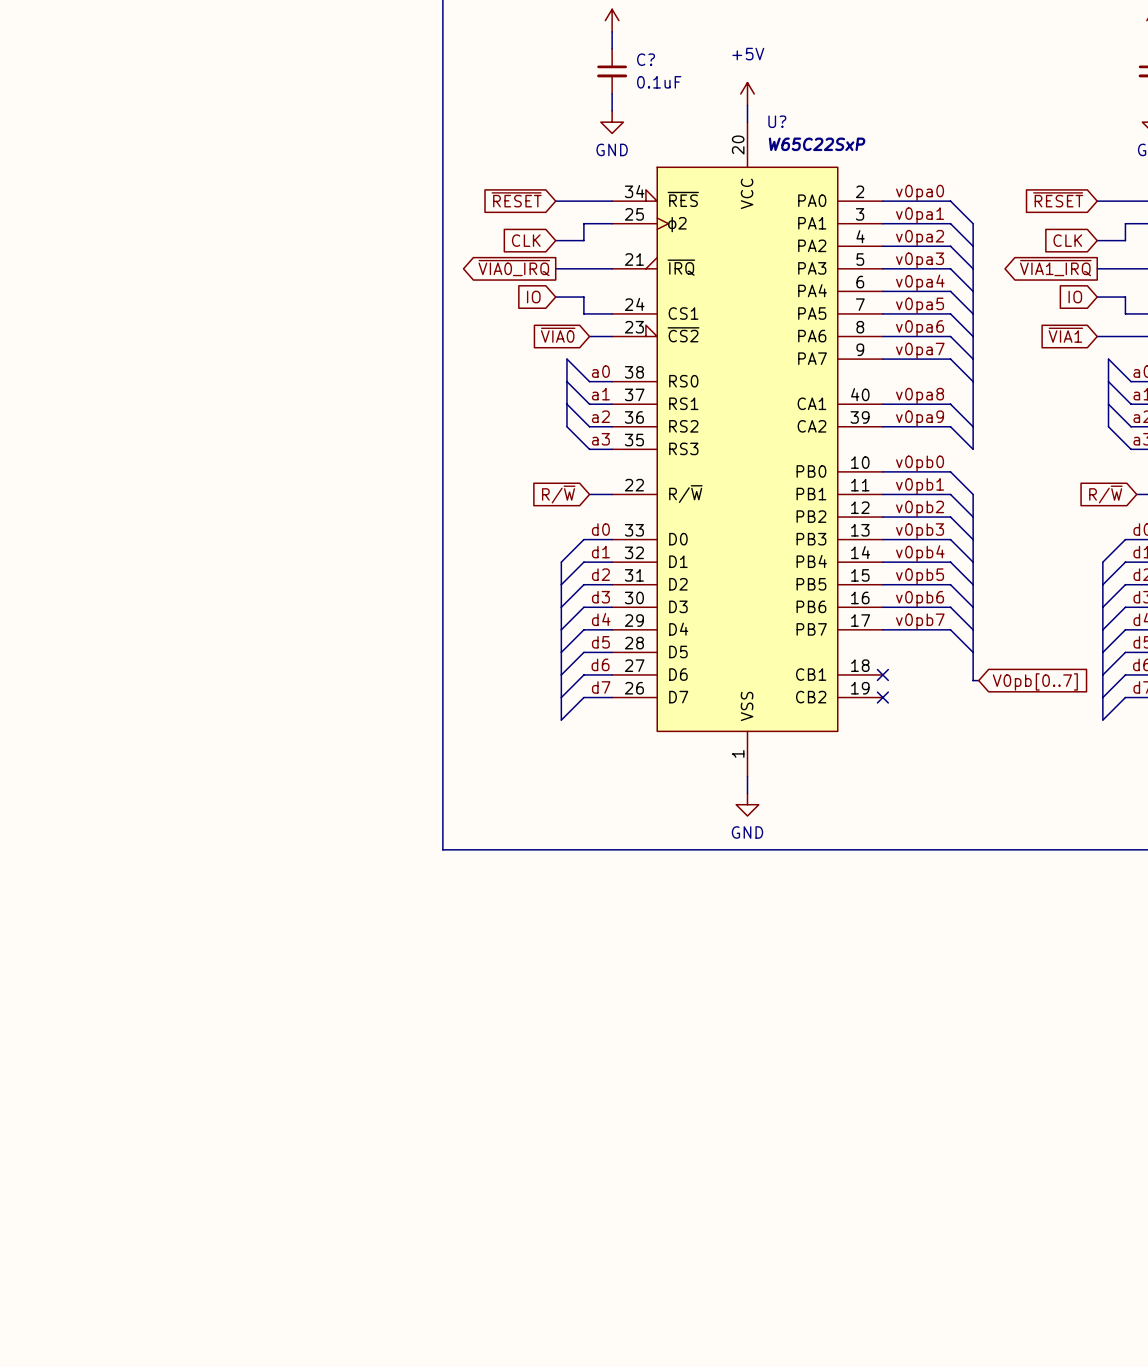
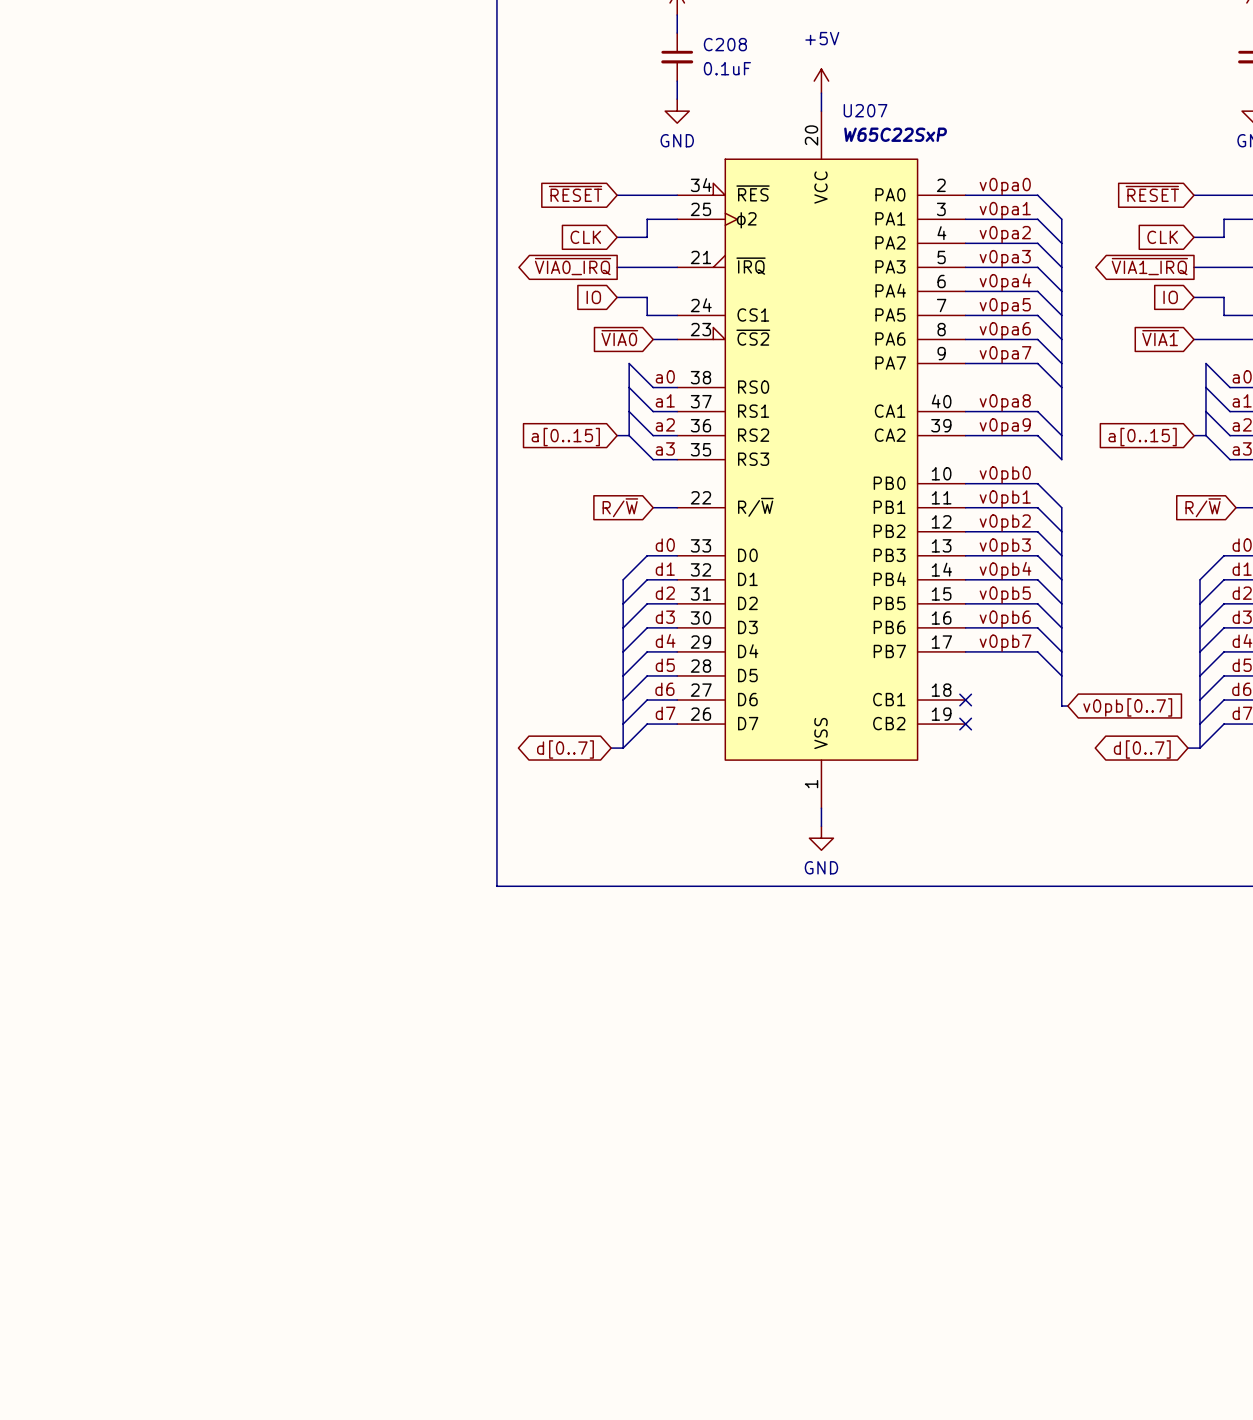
C? name: C? (646, 59) -> C208 (725, 44)
U? name: U? (777, 121) -> U207 (865, 110)
bus: none -> (617, 435) (629, 435)
bus: none -> (1193, 435) (1206, 435)
global label: none -> a[0..15] (565, 437)
global label: none -> a[0..15] (1142, 437)
global label: V0pb[0..7] (1035, 681) -> v0pb[0..7] (1127, 707)
bus: none -> (611, 748) (623, 748)
bus: none -> (1187, 748) (1199, 748)
global label: none -> d[0..7] (565, 749)
global label: none -> d[0..7] (1142, 749)

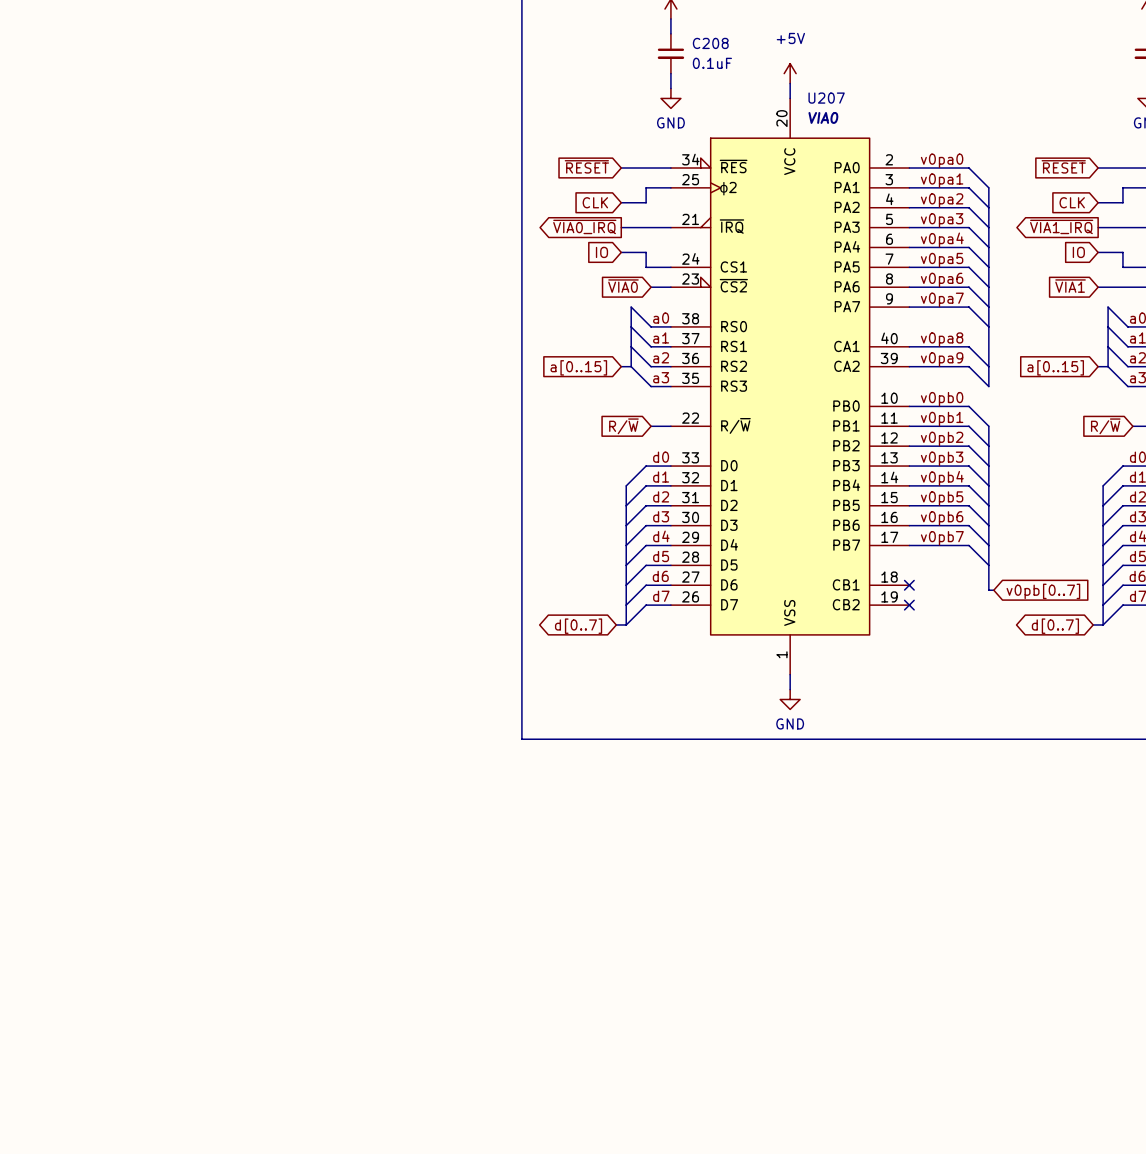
U207 value: W65C22SxP (895, 134) -> VIA0 (823, 117)

